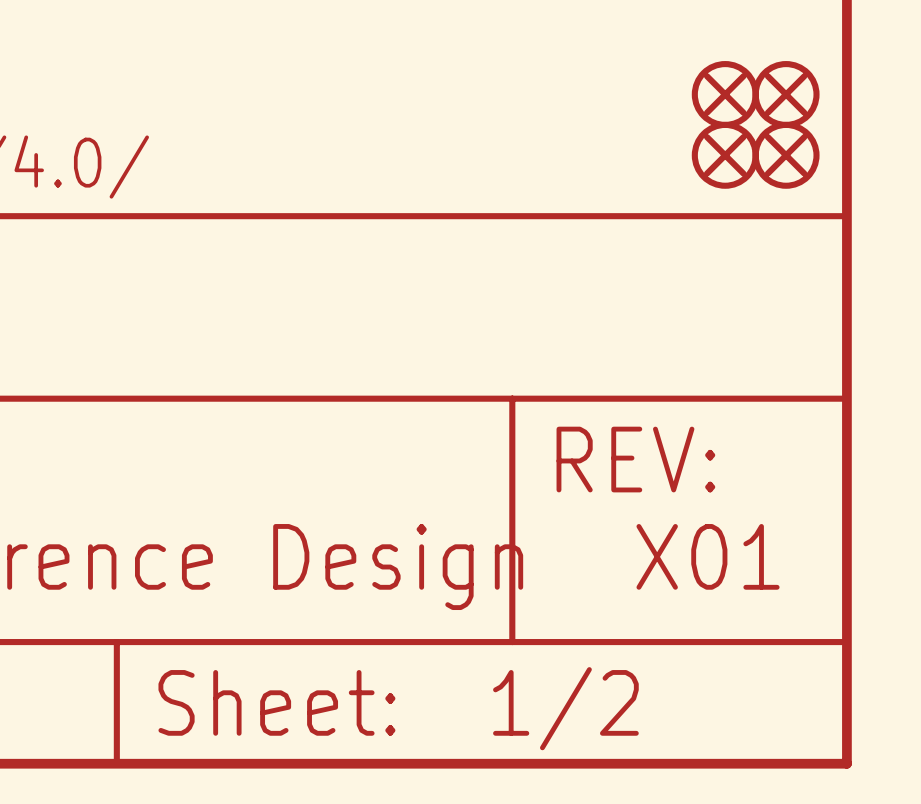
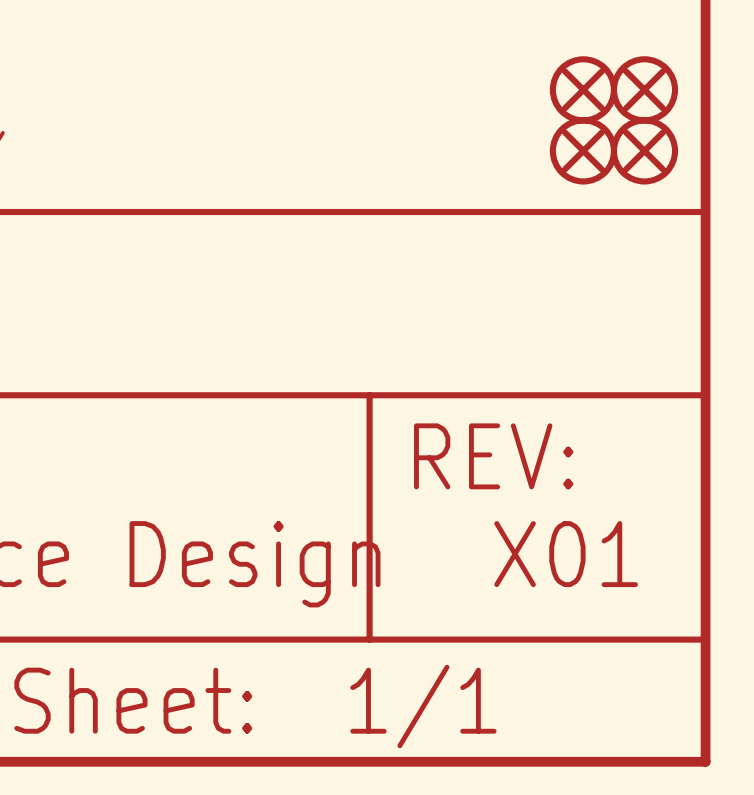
part text: 1/2 (565, 708) -> 1/1 (423, 706)

